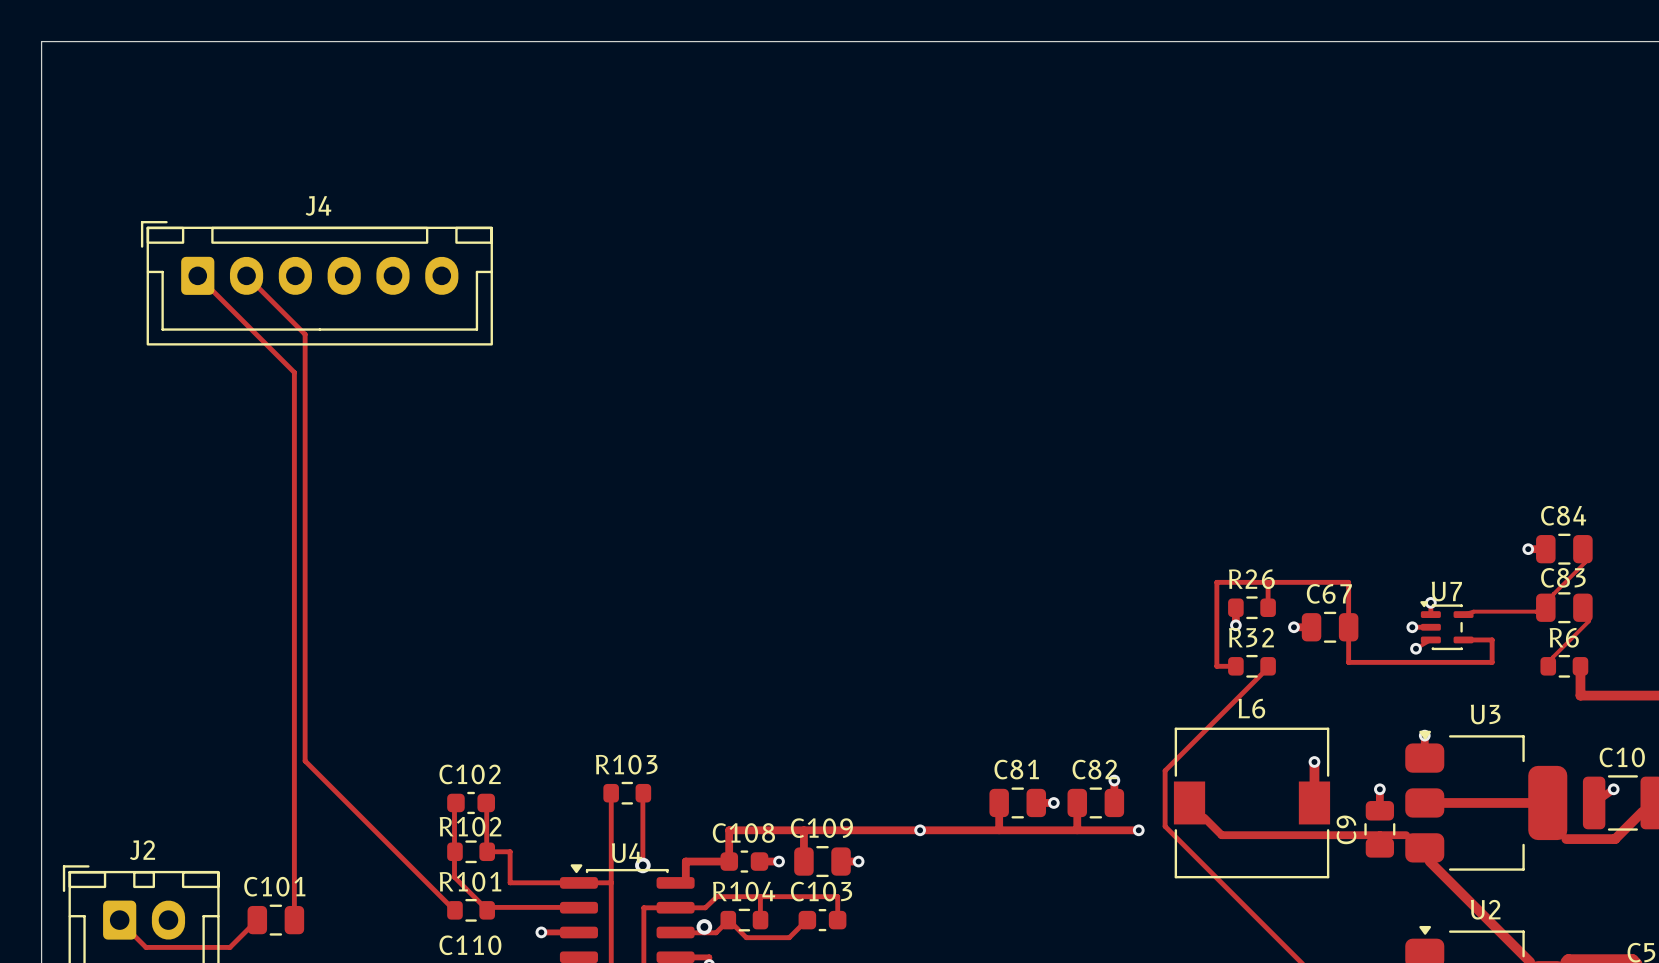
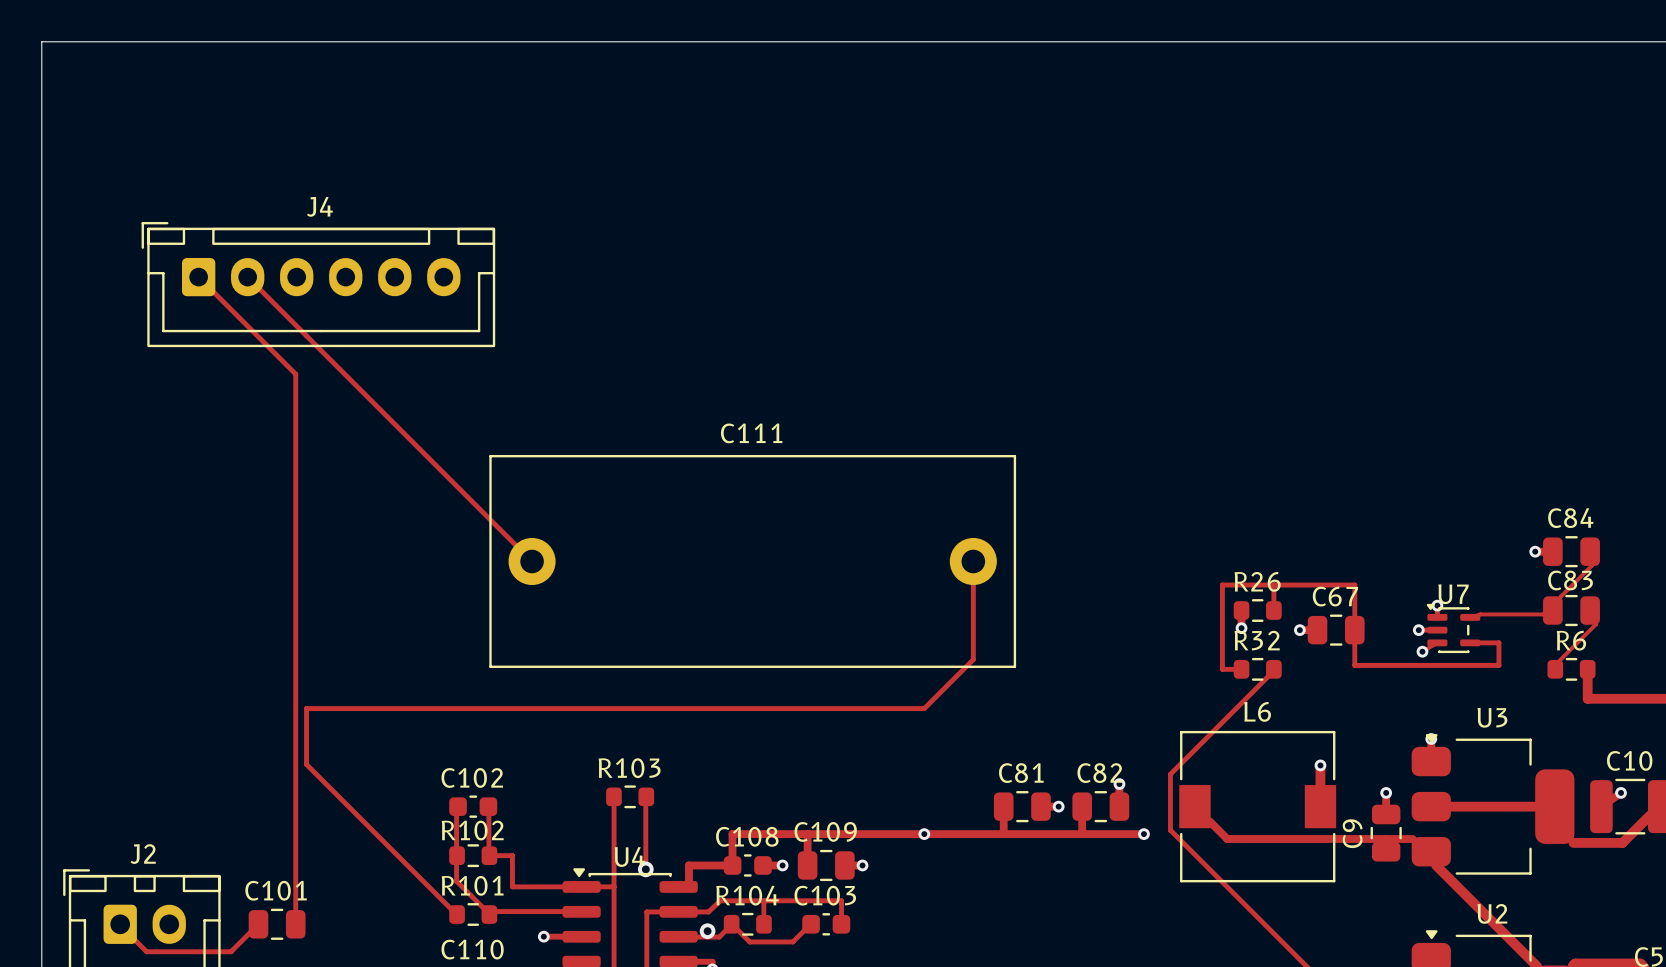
top track: (305, 334) (305, 705) -> (306, 335) (532, 561)
C111: none -> (752, 561)
top track: none -> (973, 561) (973, 659) (924, 708) (306, 708)

